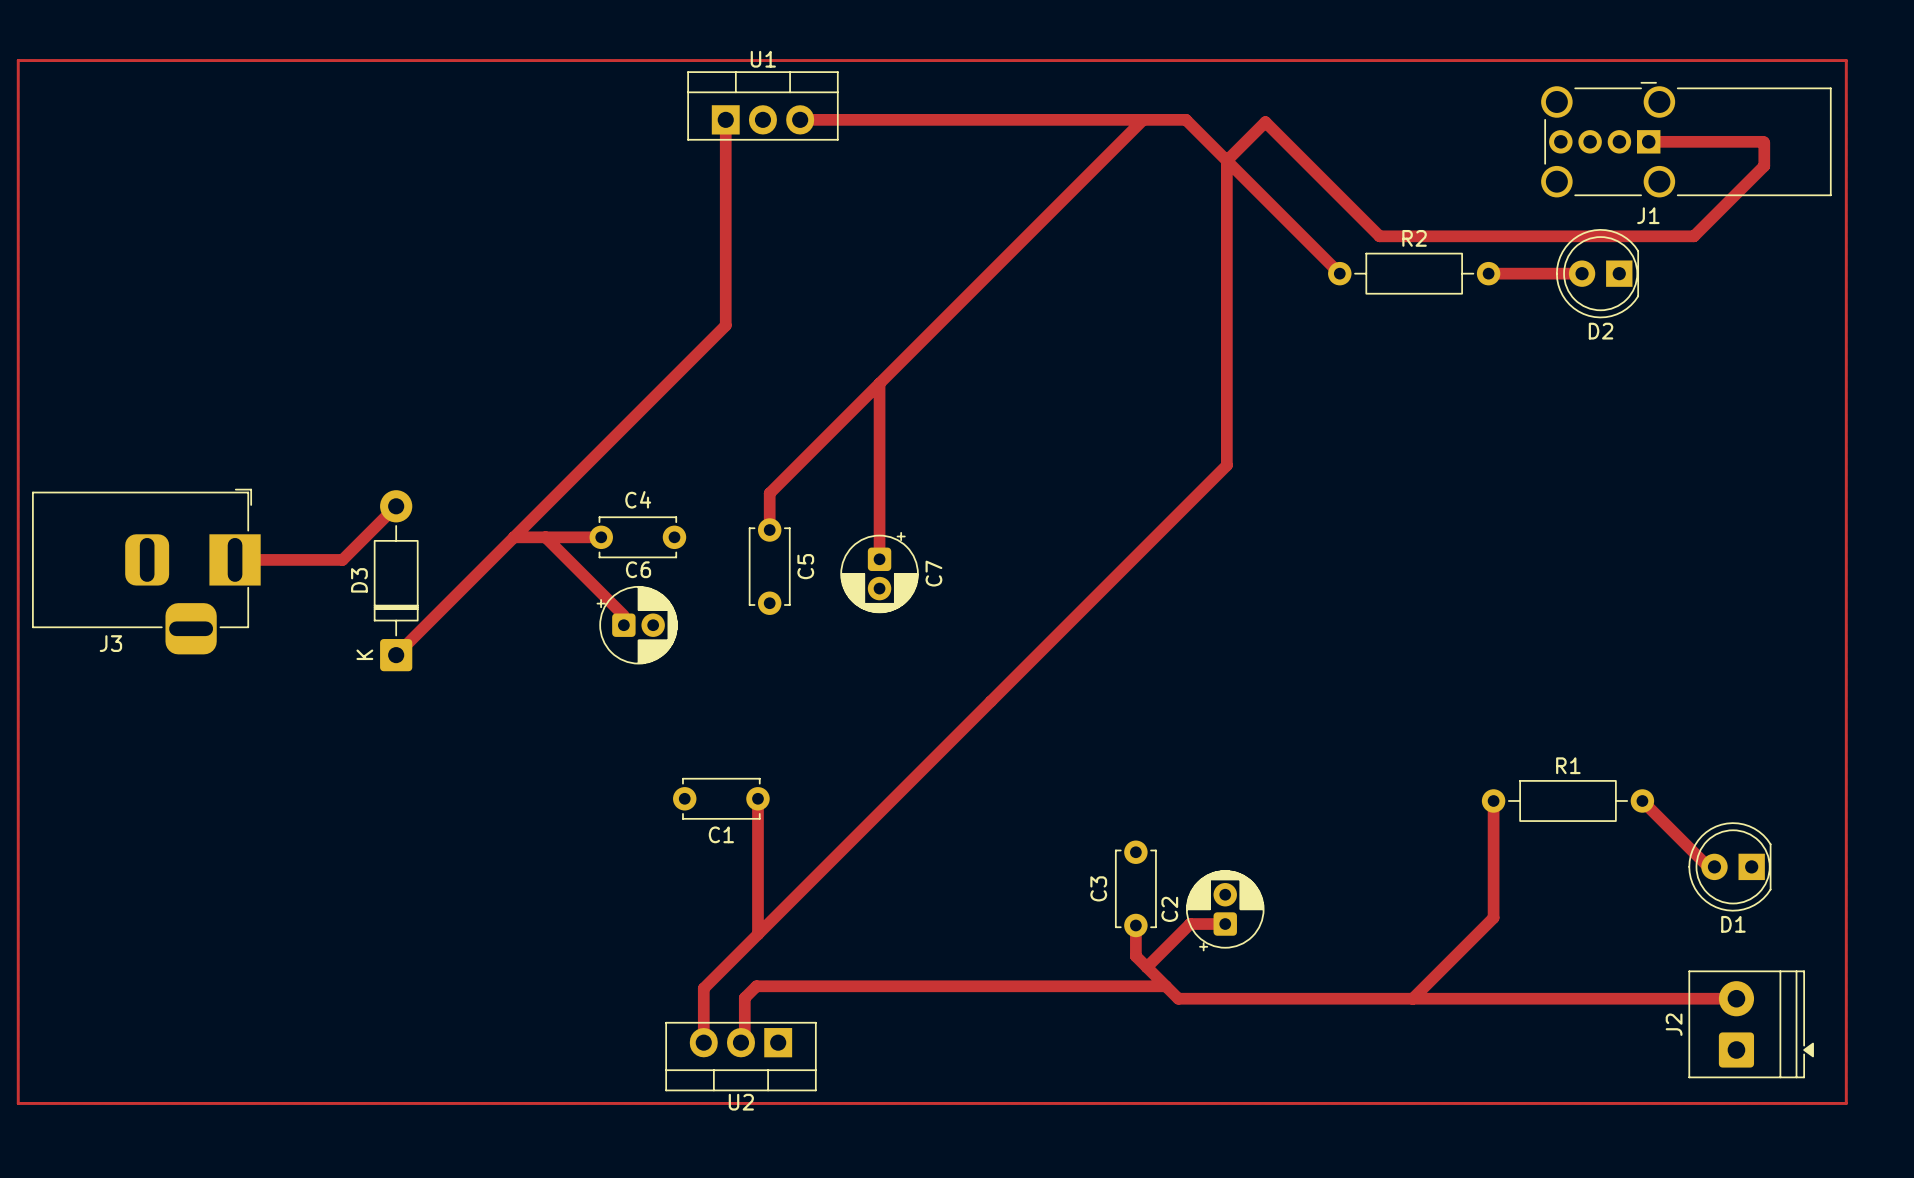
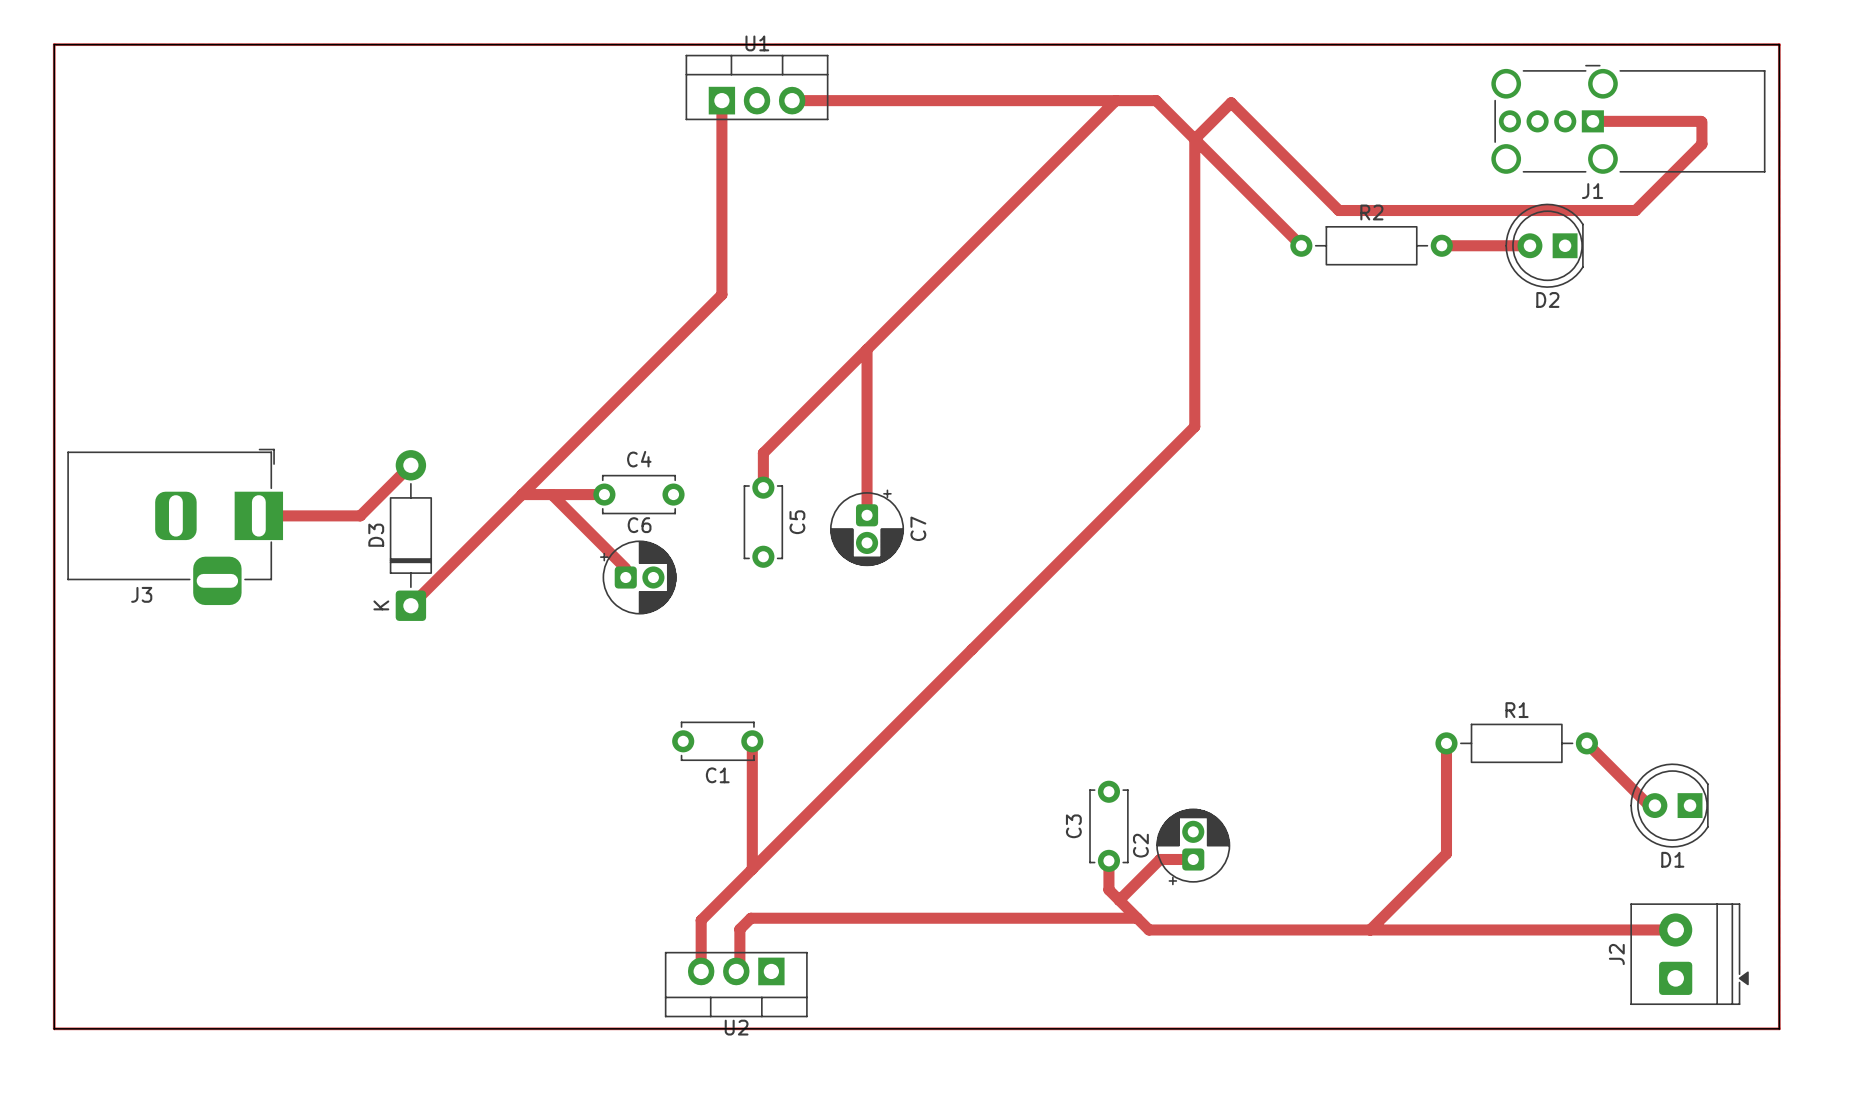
board edge: none -> (54, 44) (1779, 44) (1779, 1028) (54, 1028) (54, 44)

